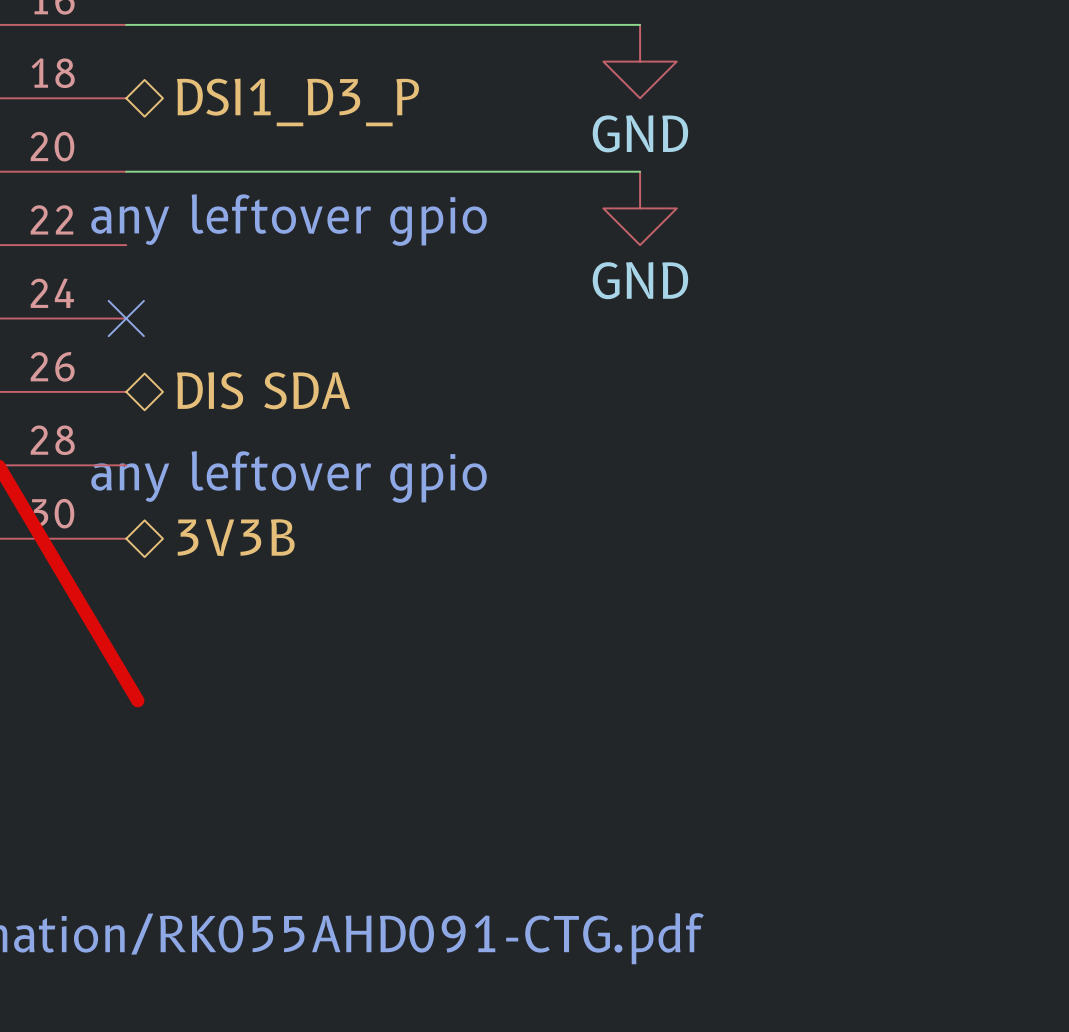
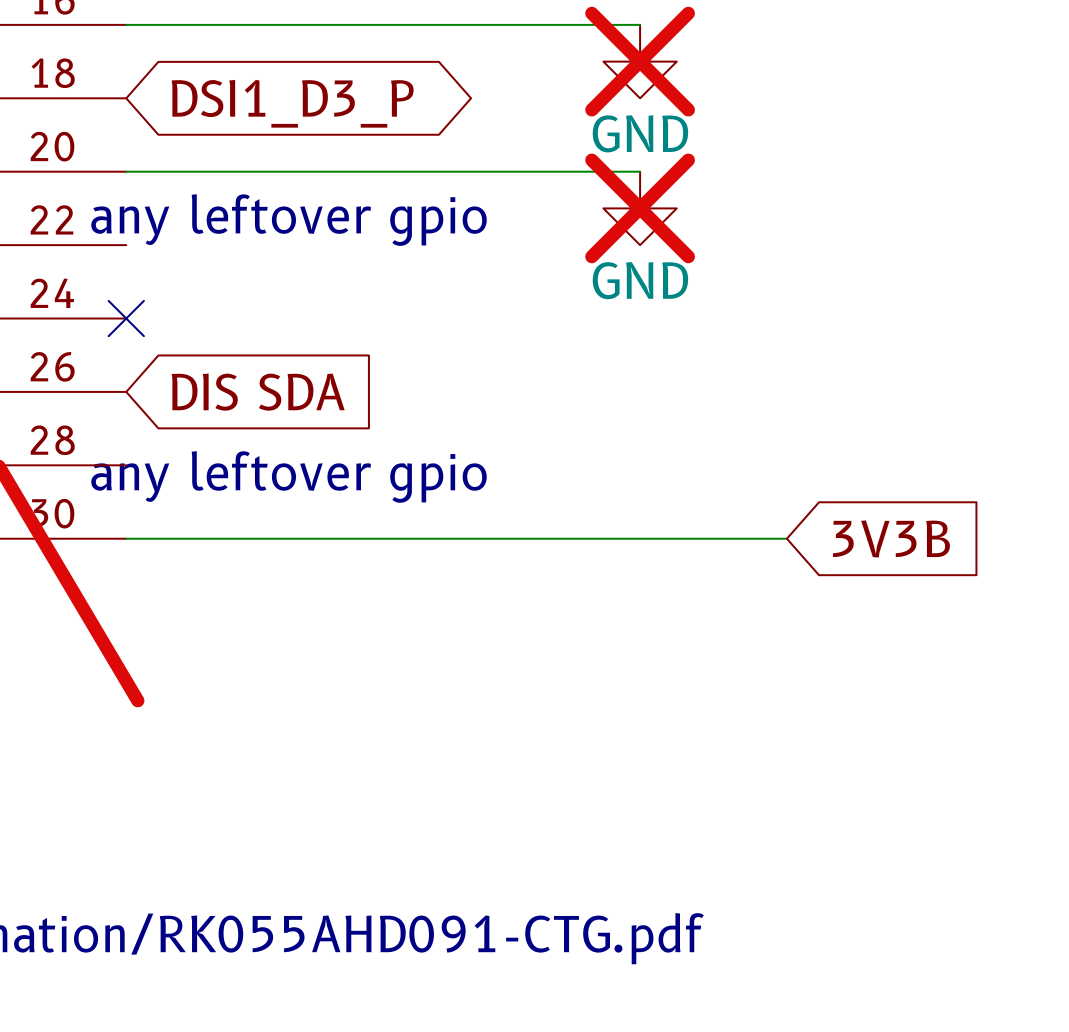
power symbol do-not-place cross: none -> (640, 61)
hierarchical label: DSI1_D3_P (297, 102) -> none
global label: none -> DSI1_D3_P (292, 103)
power symbol do-not-place cross: none -> (640, 208)
hierarchical label: DIS SDA (263, 390) -> none
global label: none -> DIS SDA (258, 392)
hierarchical label: 3V3B (236, 537) -> none
wire: none -> (126, 538) (786, 538)
global label: none -> 3V3B (891, 538)

